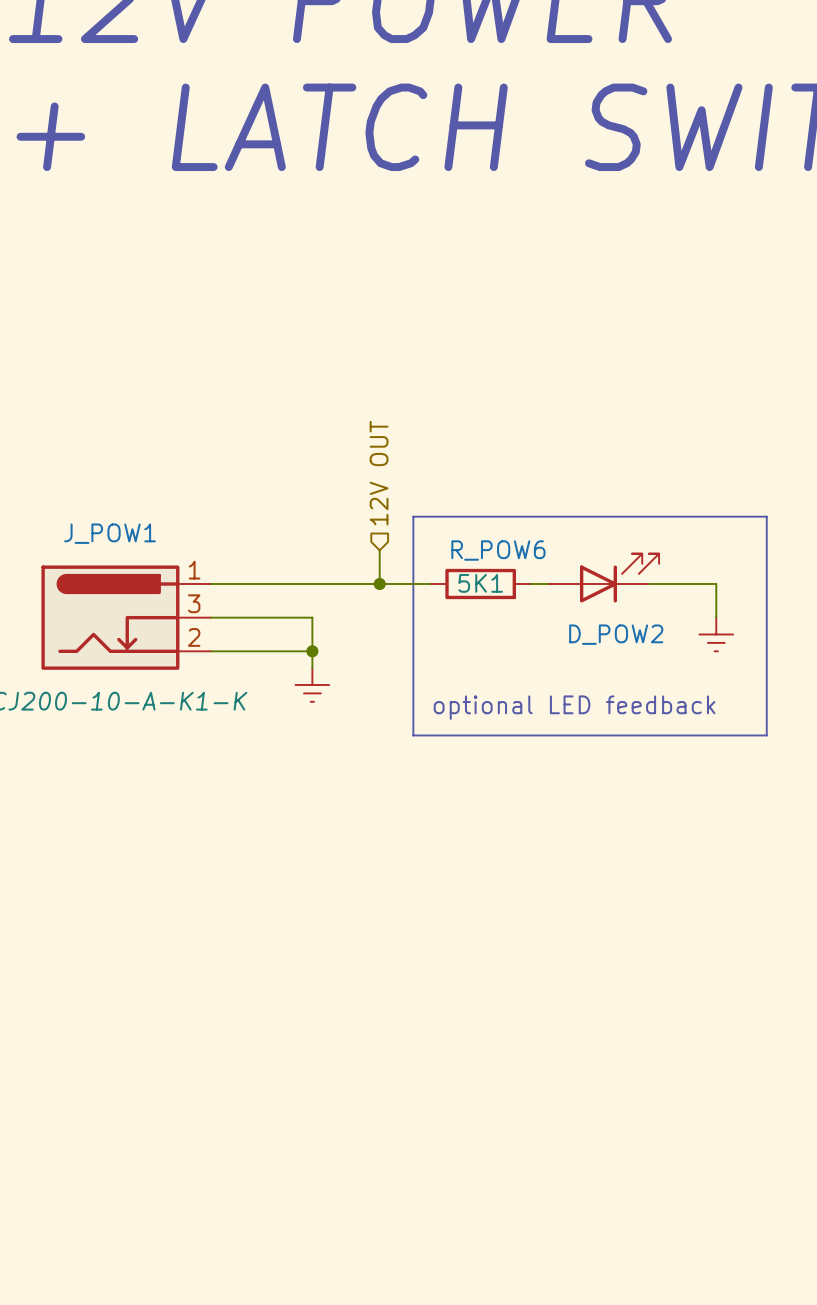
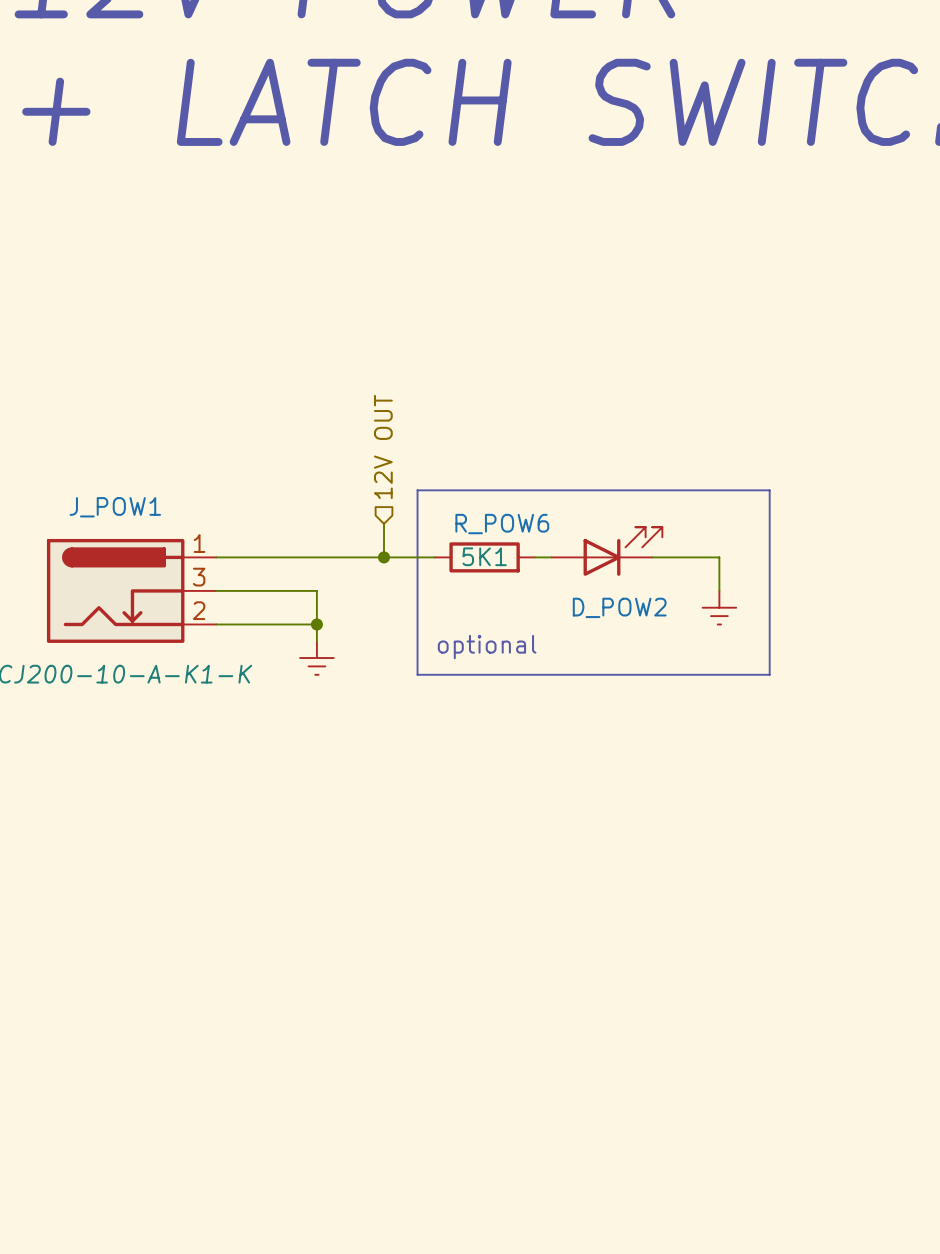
text: none -> optional (487, 647)
line: (413, 701) (413, 735) (766, 735) (766, 701) -> (417, 674) (769, 674)
text: optional LED feedback (574, 707) -> none

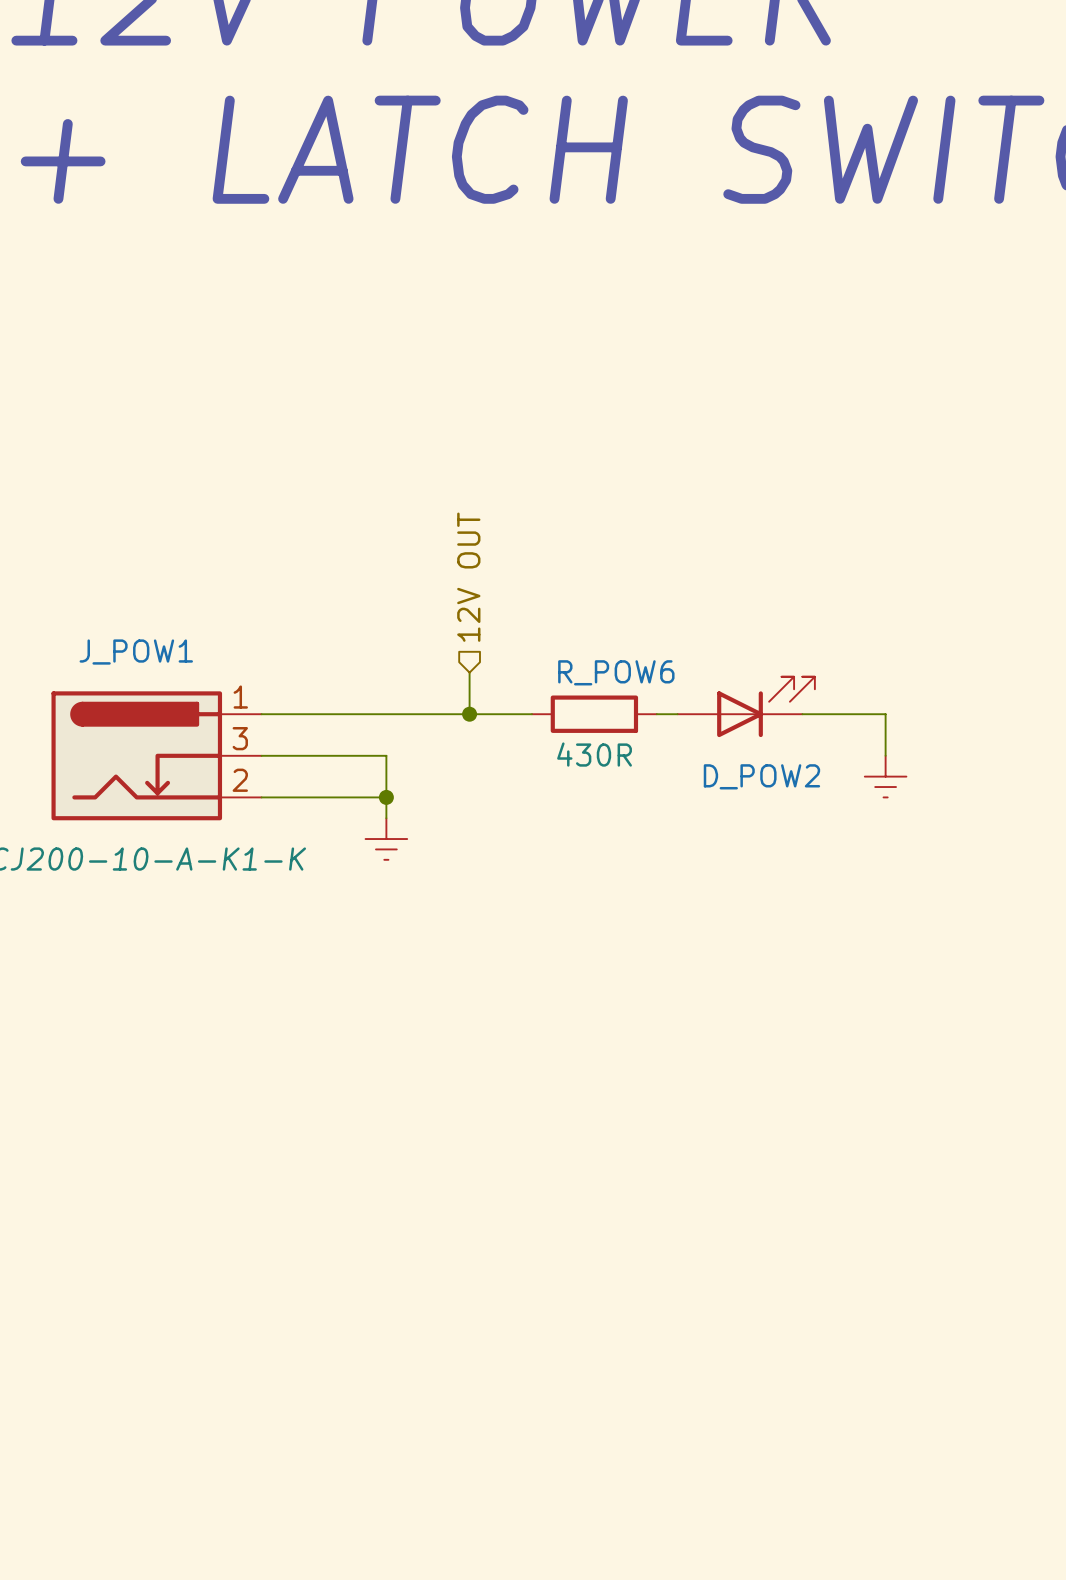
line: (417, 490) (769, 490) (769, 674) (417, 674) (417, 490) -> none
R_POW6 value: 5K1 (484, 556) -> 430R (594, 754)
text: optional (487, 647) -> none

